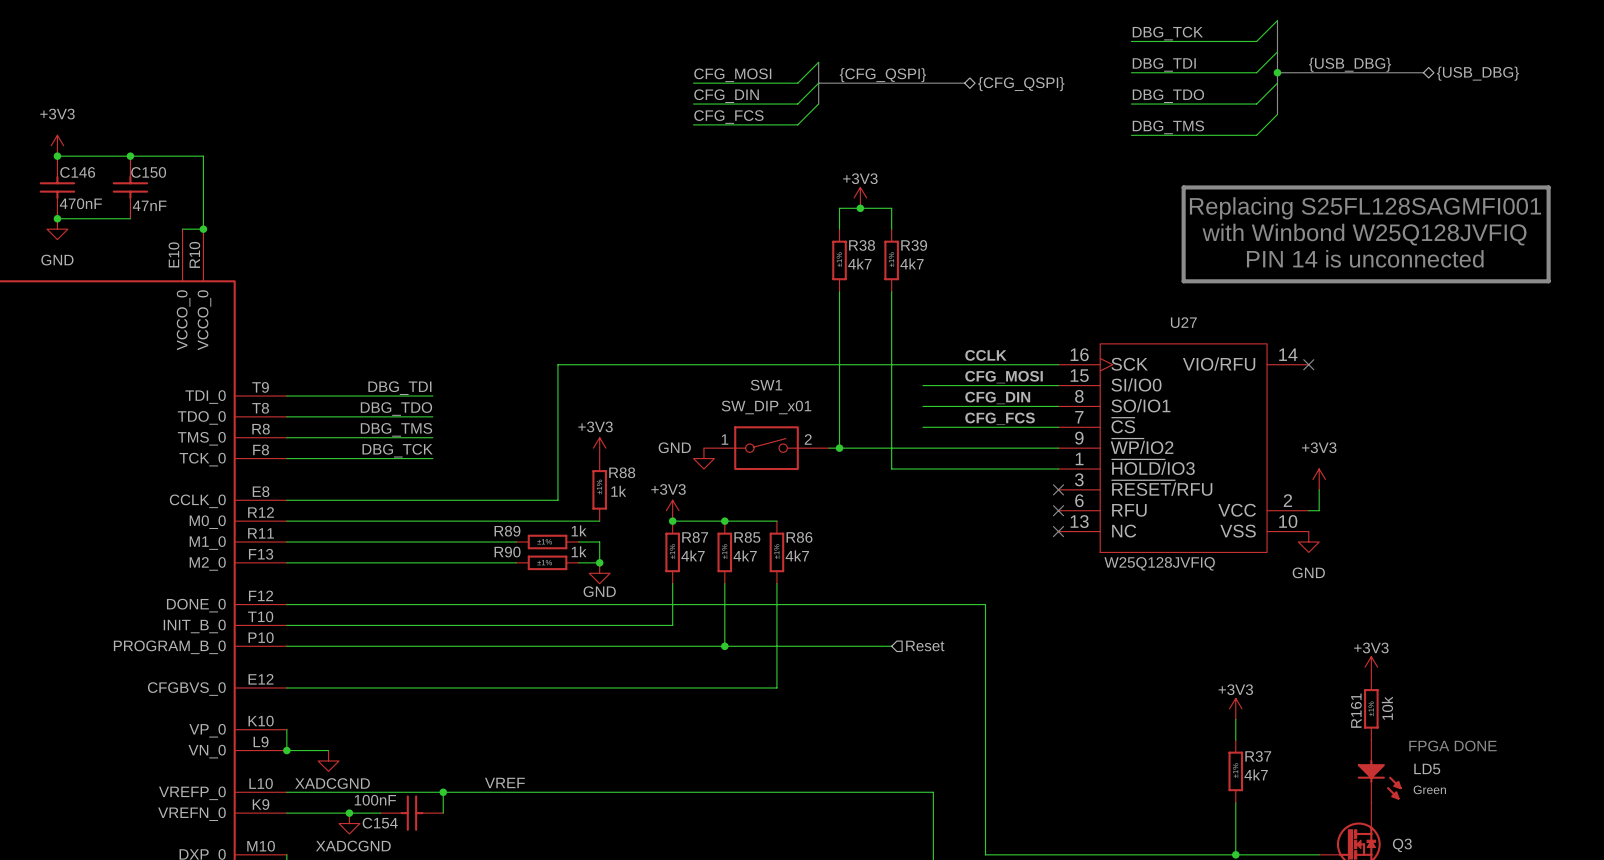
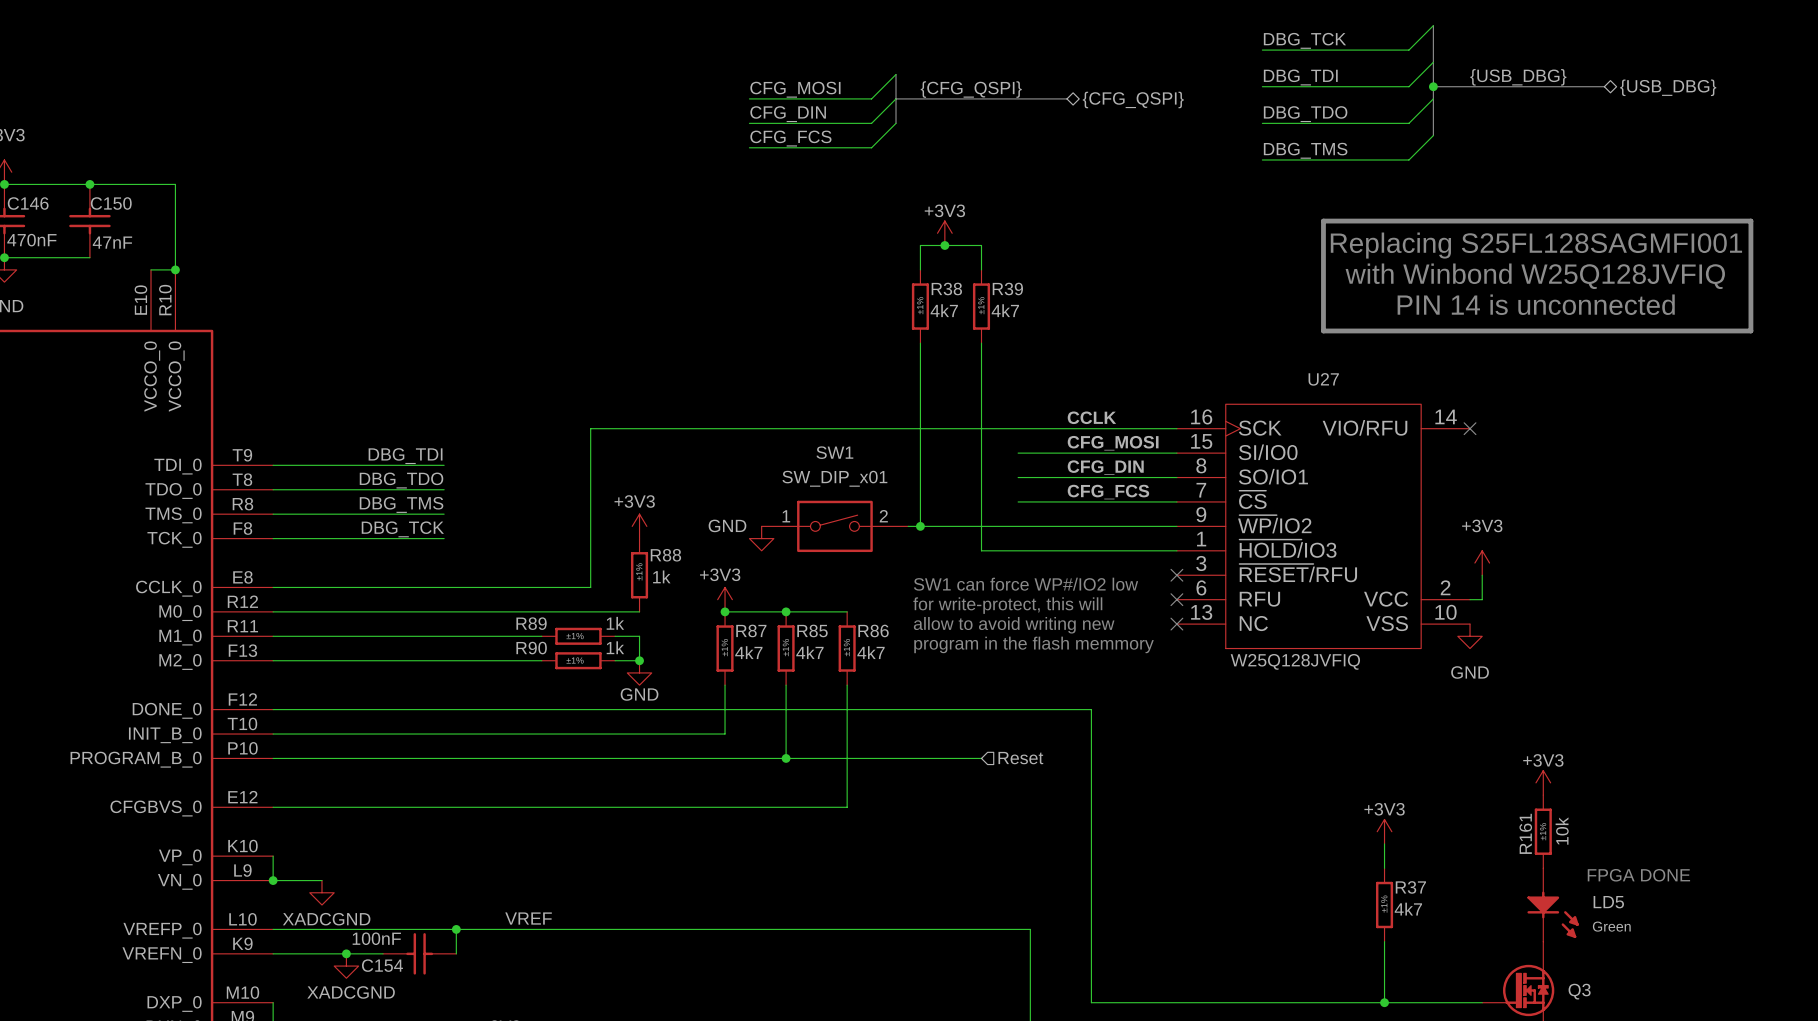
text: none -> SW1 can force WP#/IO2 low (1026, 584)
text: none -> for write-protect, this will (1007, 605)
text: none -> allow to avoid writing new (1014, 625)
text: none -> program in the flash memmory (1034, 644)

